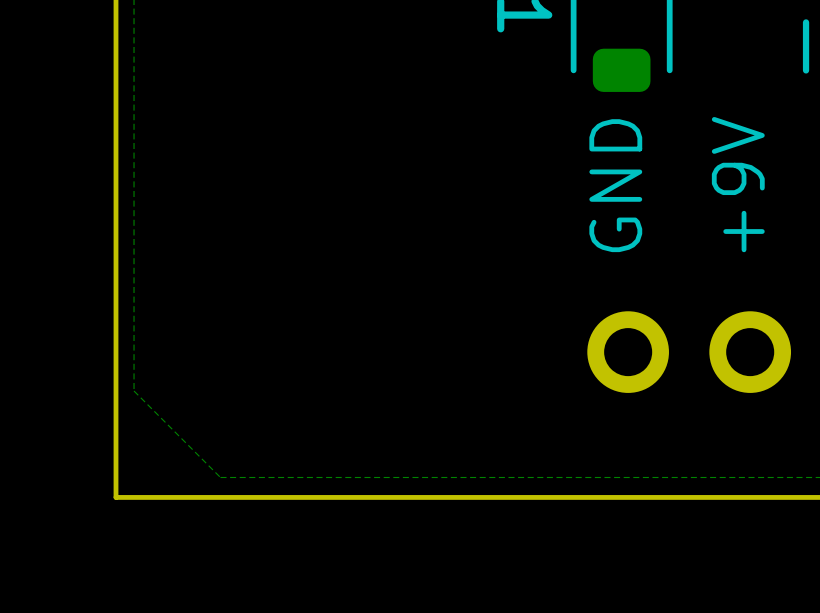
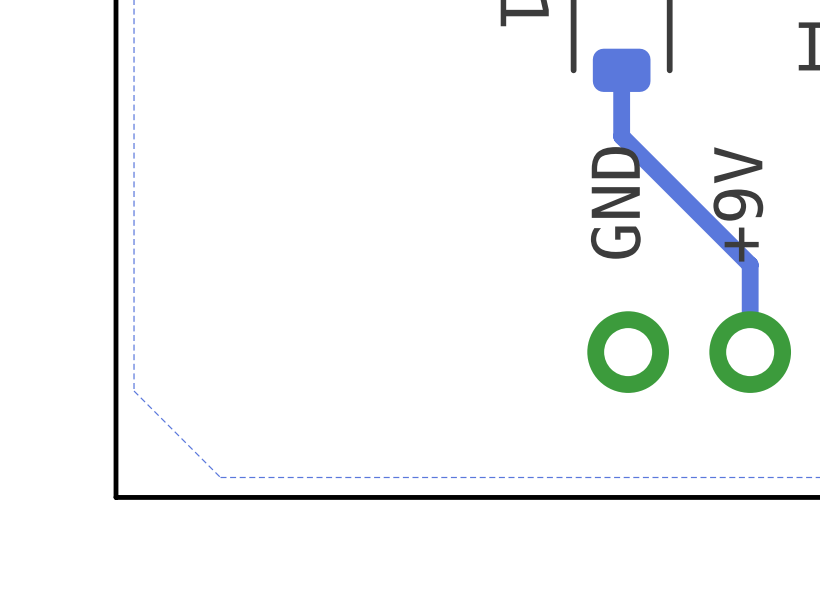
track: none -> (621, 70) (621, 136) (750, 264) (750, 352)

